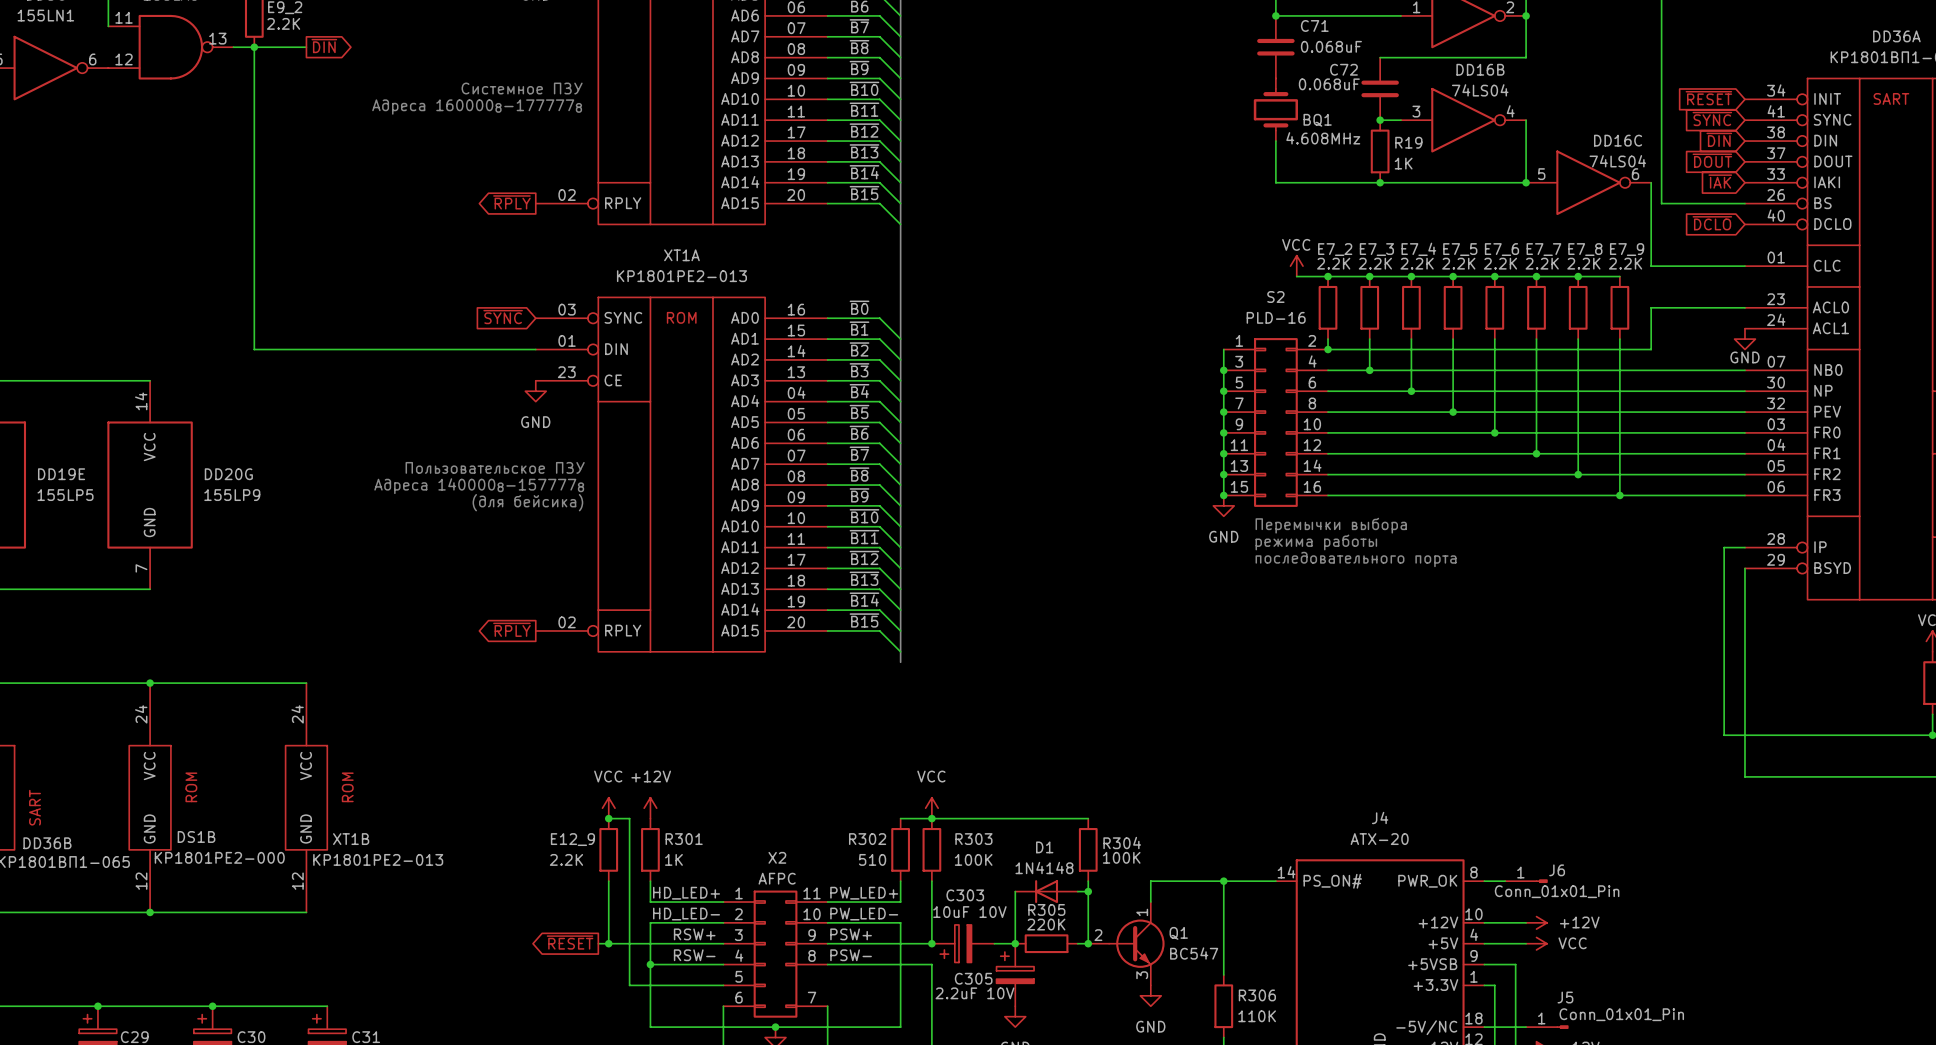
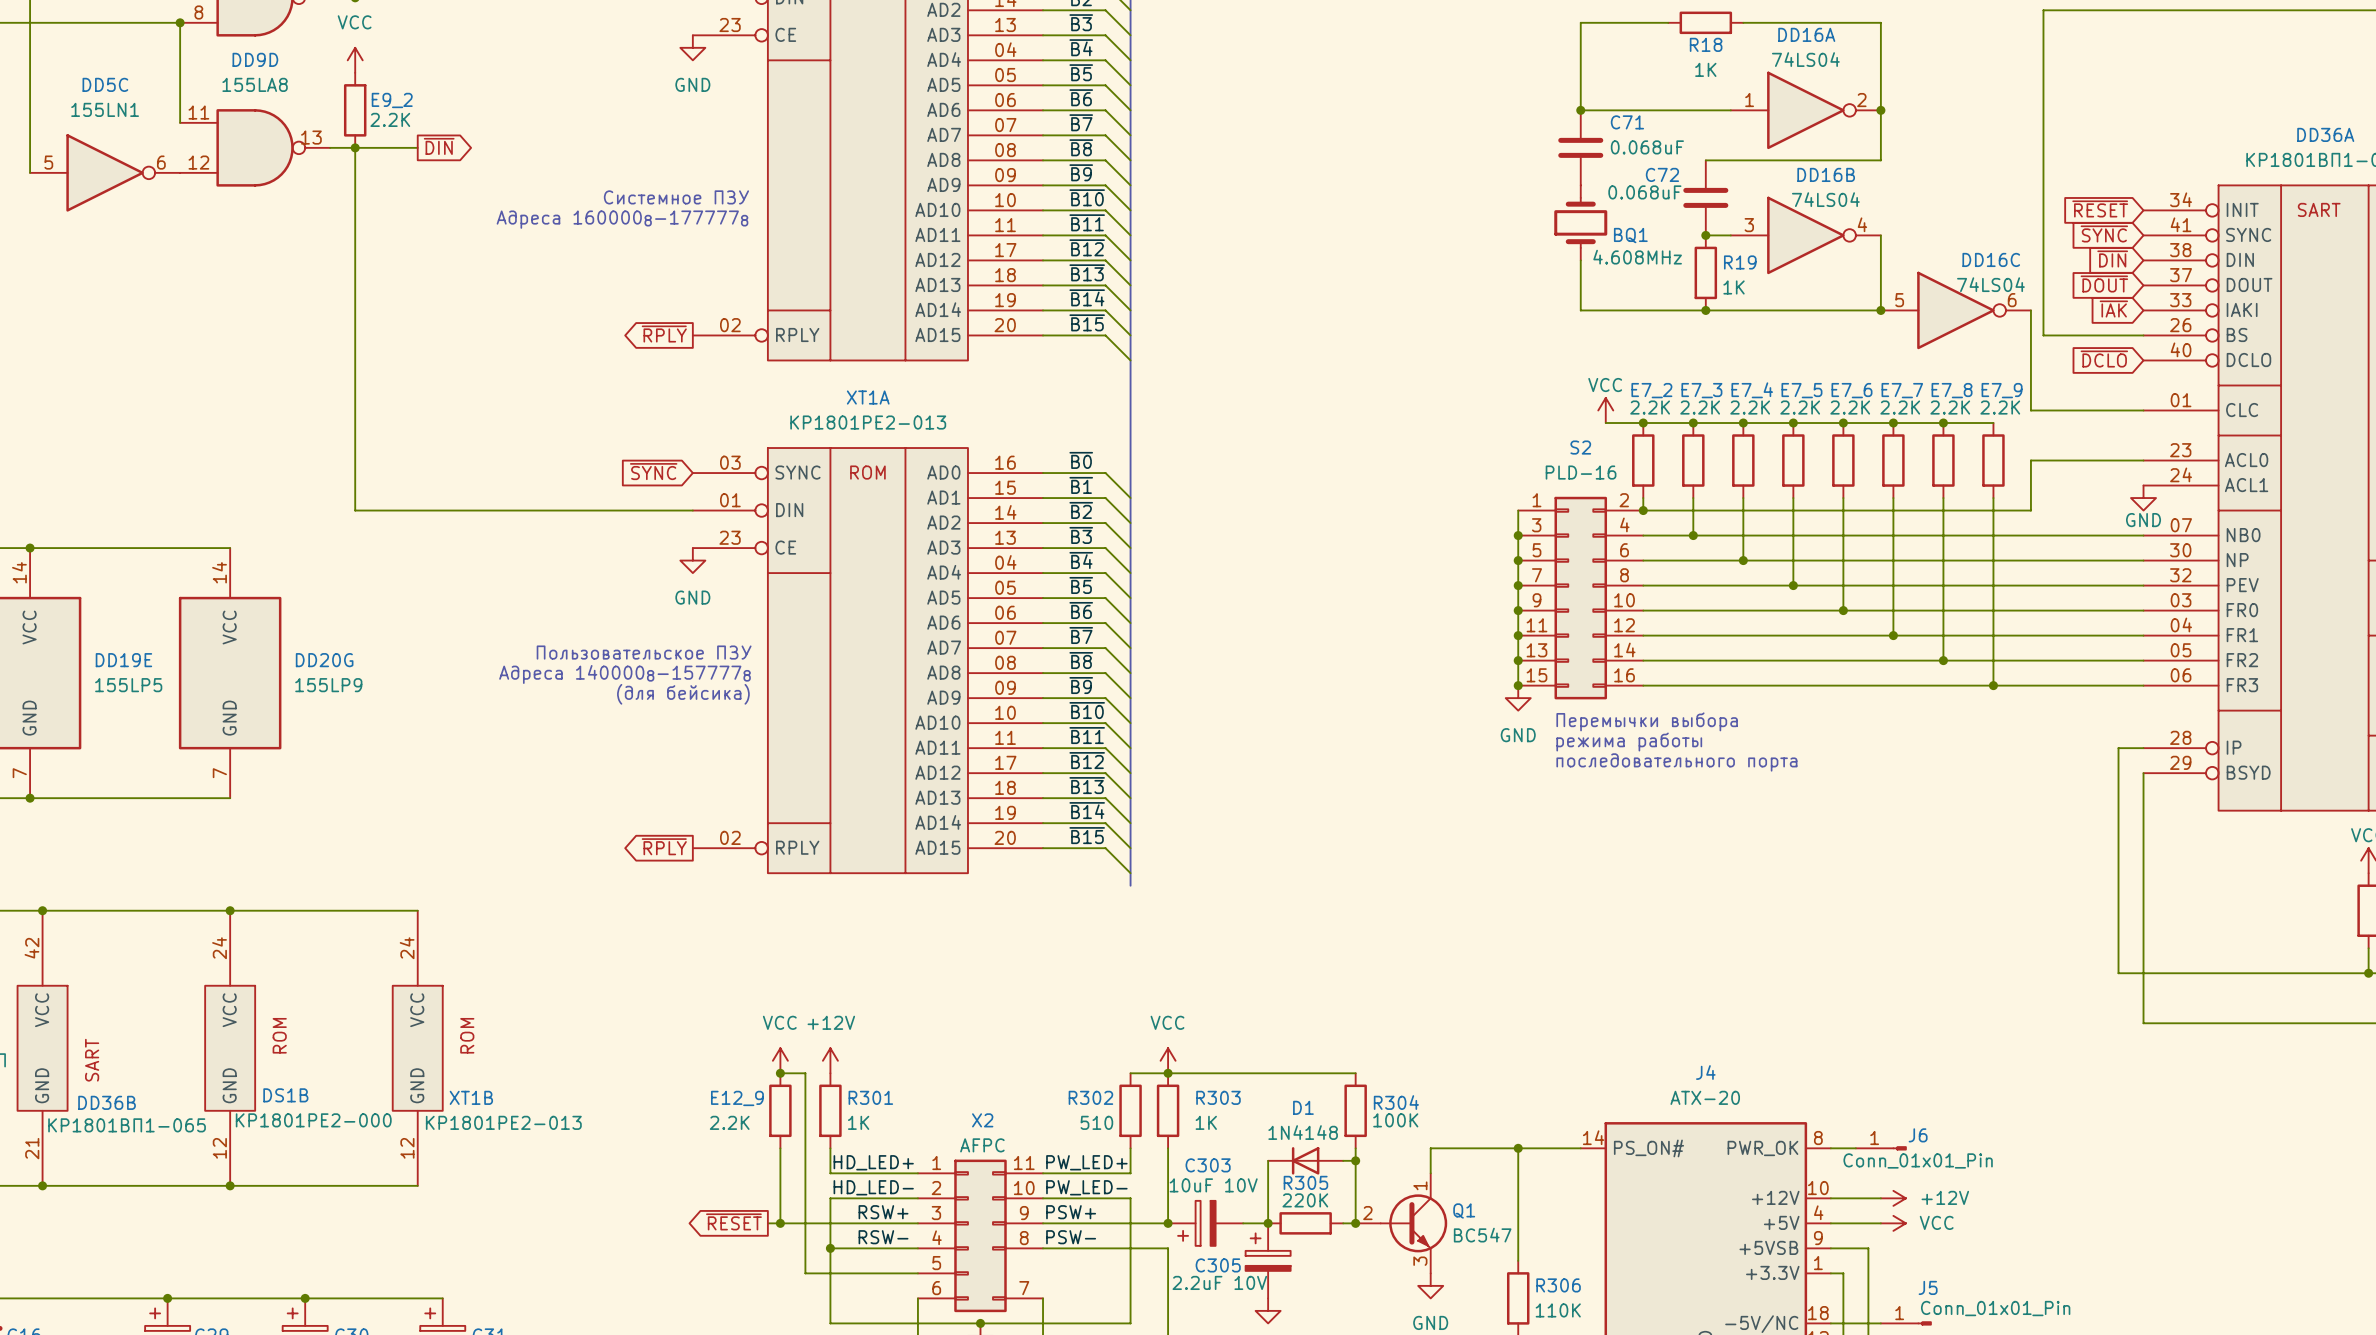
R303 value: 100K (973, 859) -> 1K (1206, 1122)

